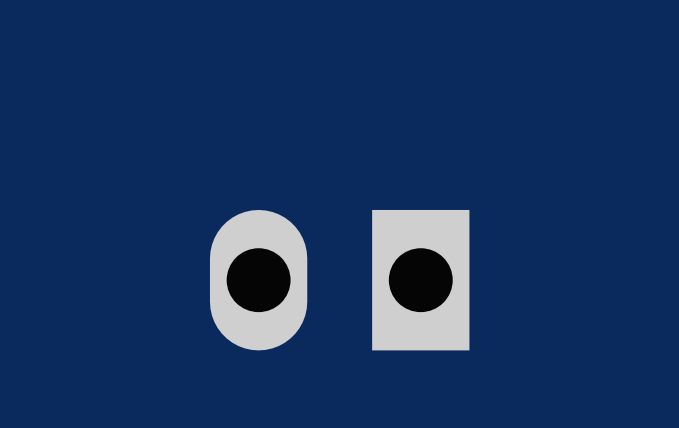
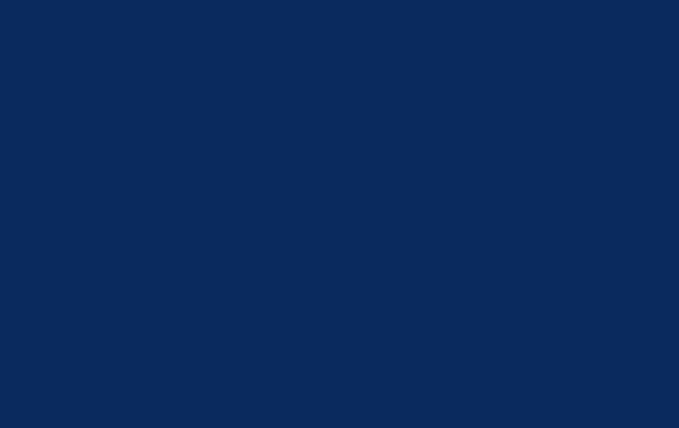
part: (339, 280) -> none

